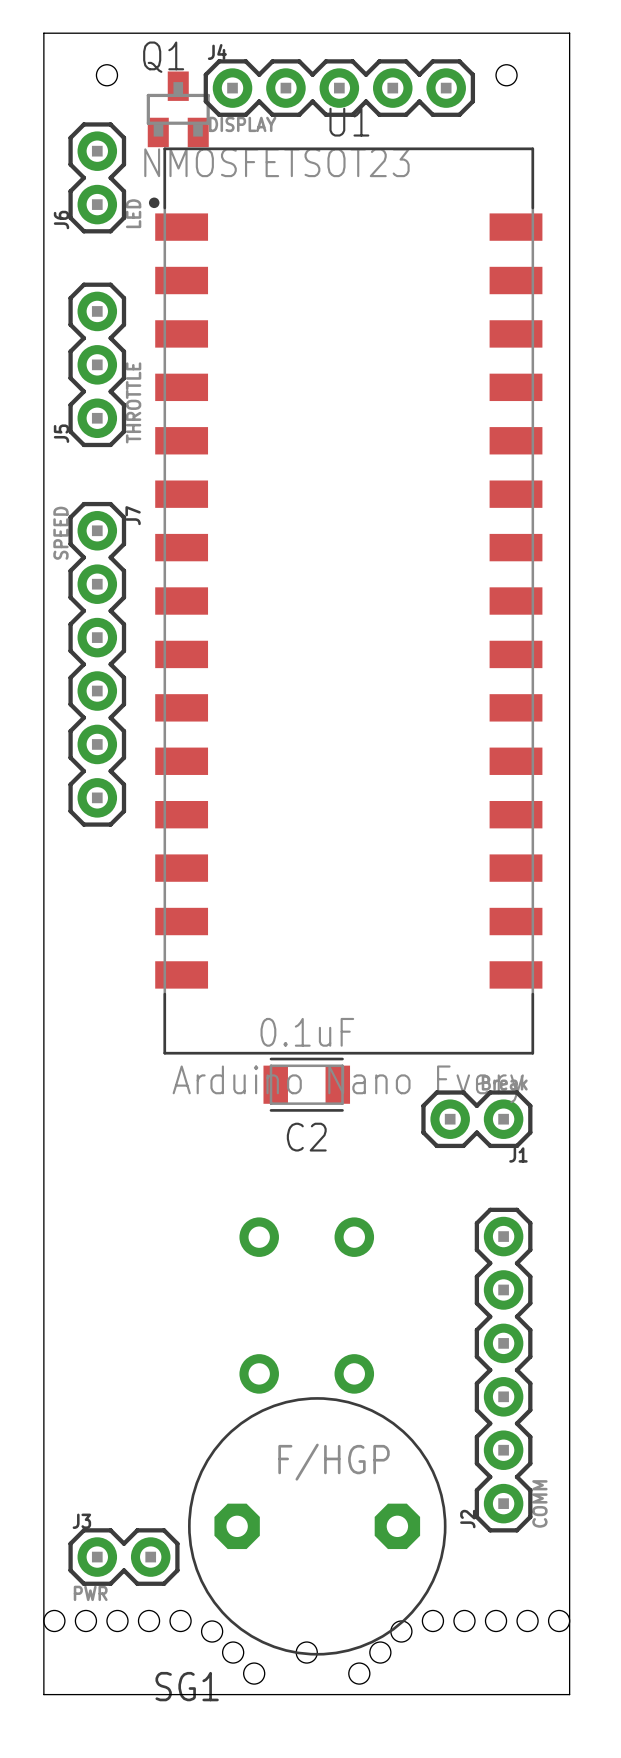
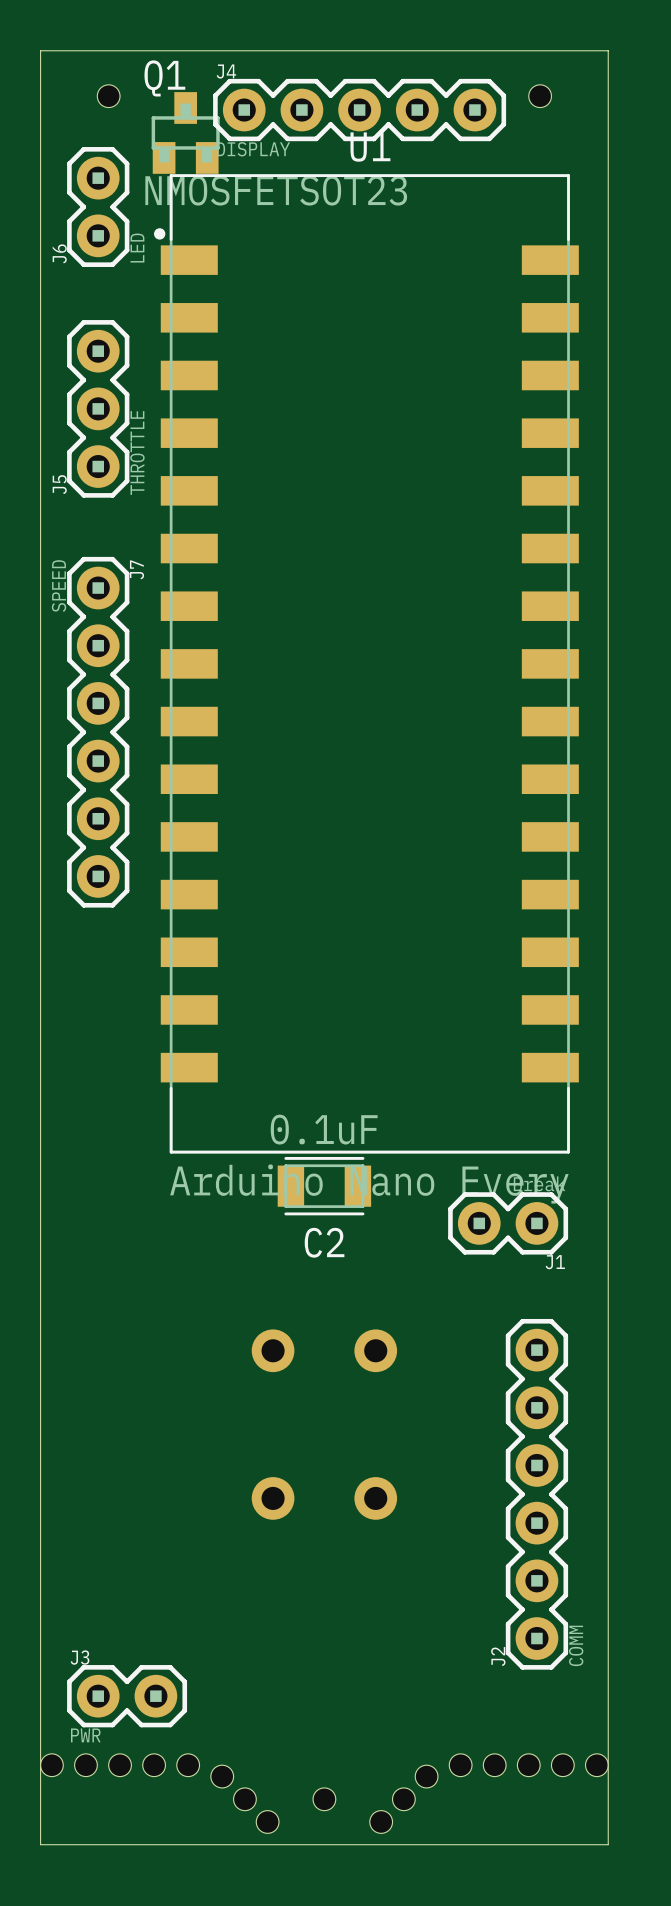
SG1: F/HGP (317, 1526) -> none

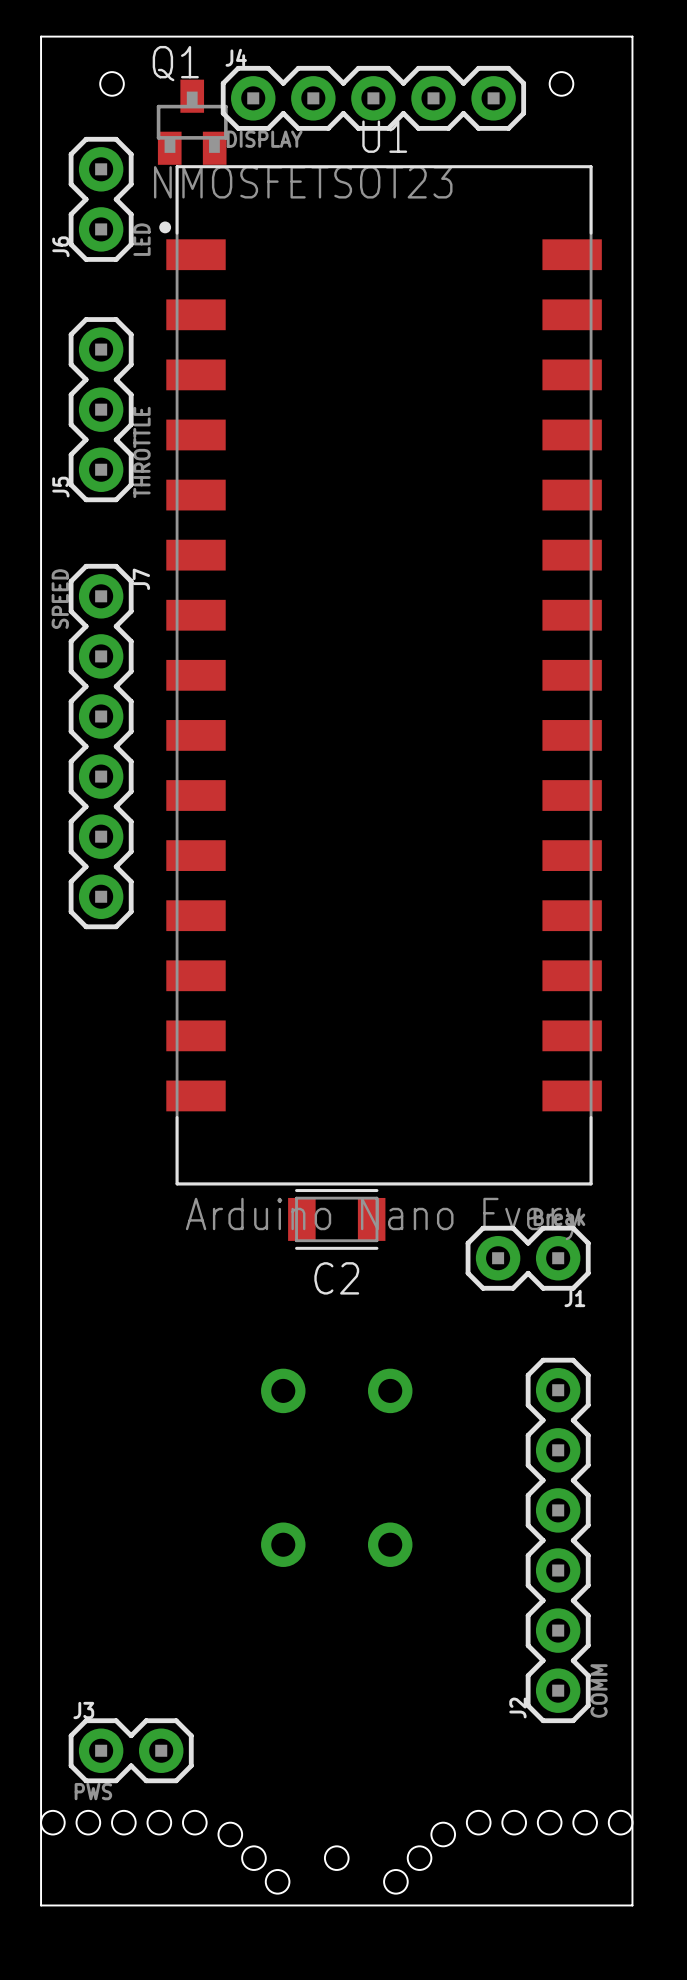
C2 value: 0.1uF (324, 1129) -> none
J3 value: PWR (85, 1735) -> PWS (93, 1791)

